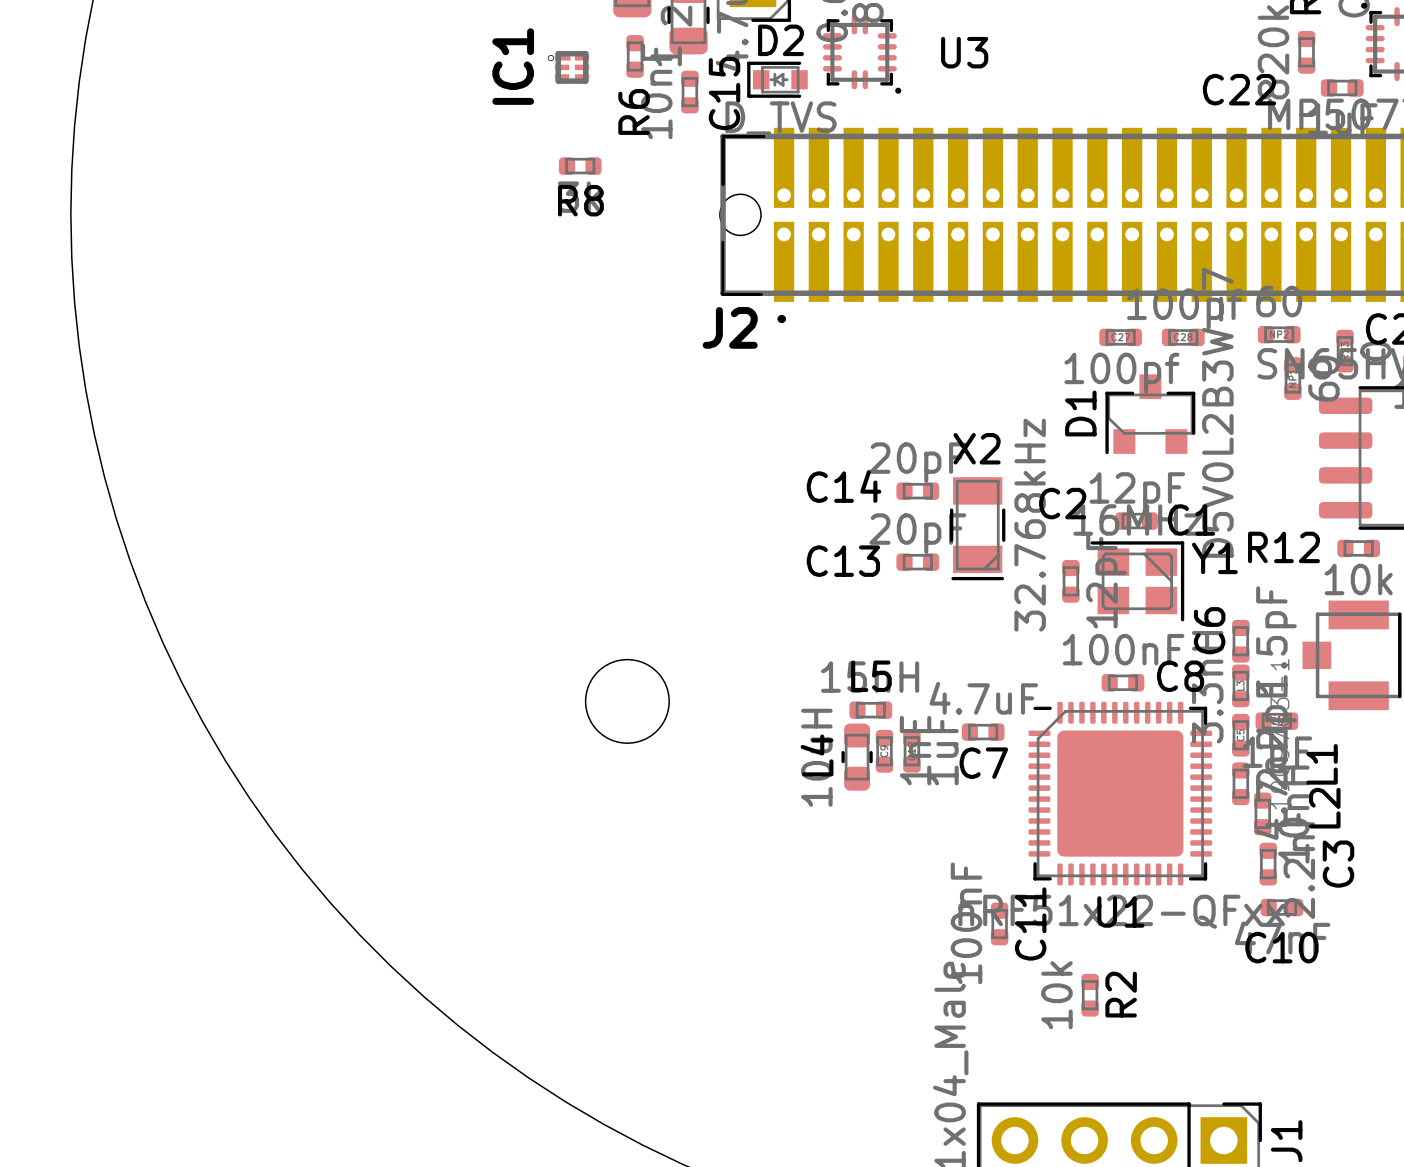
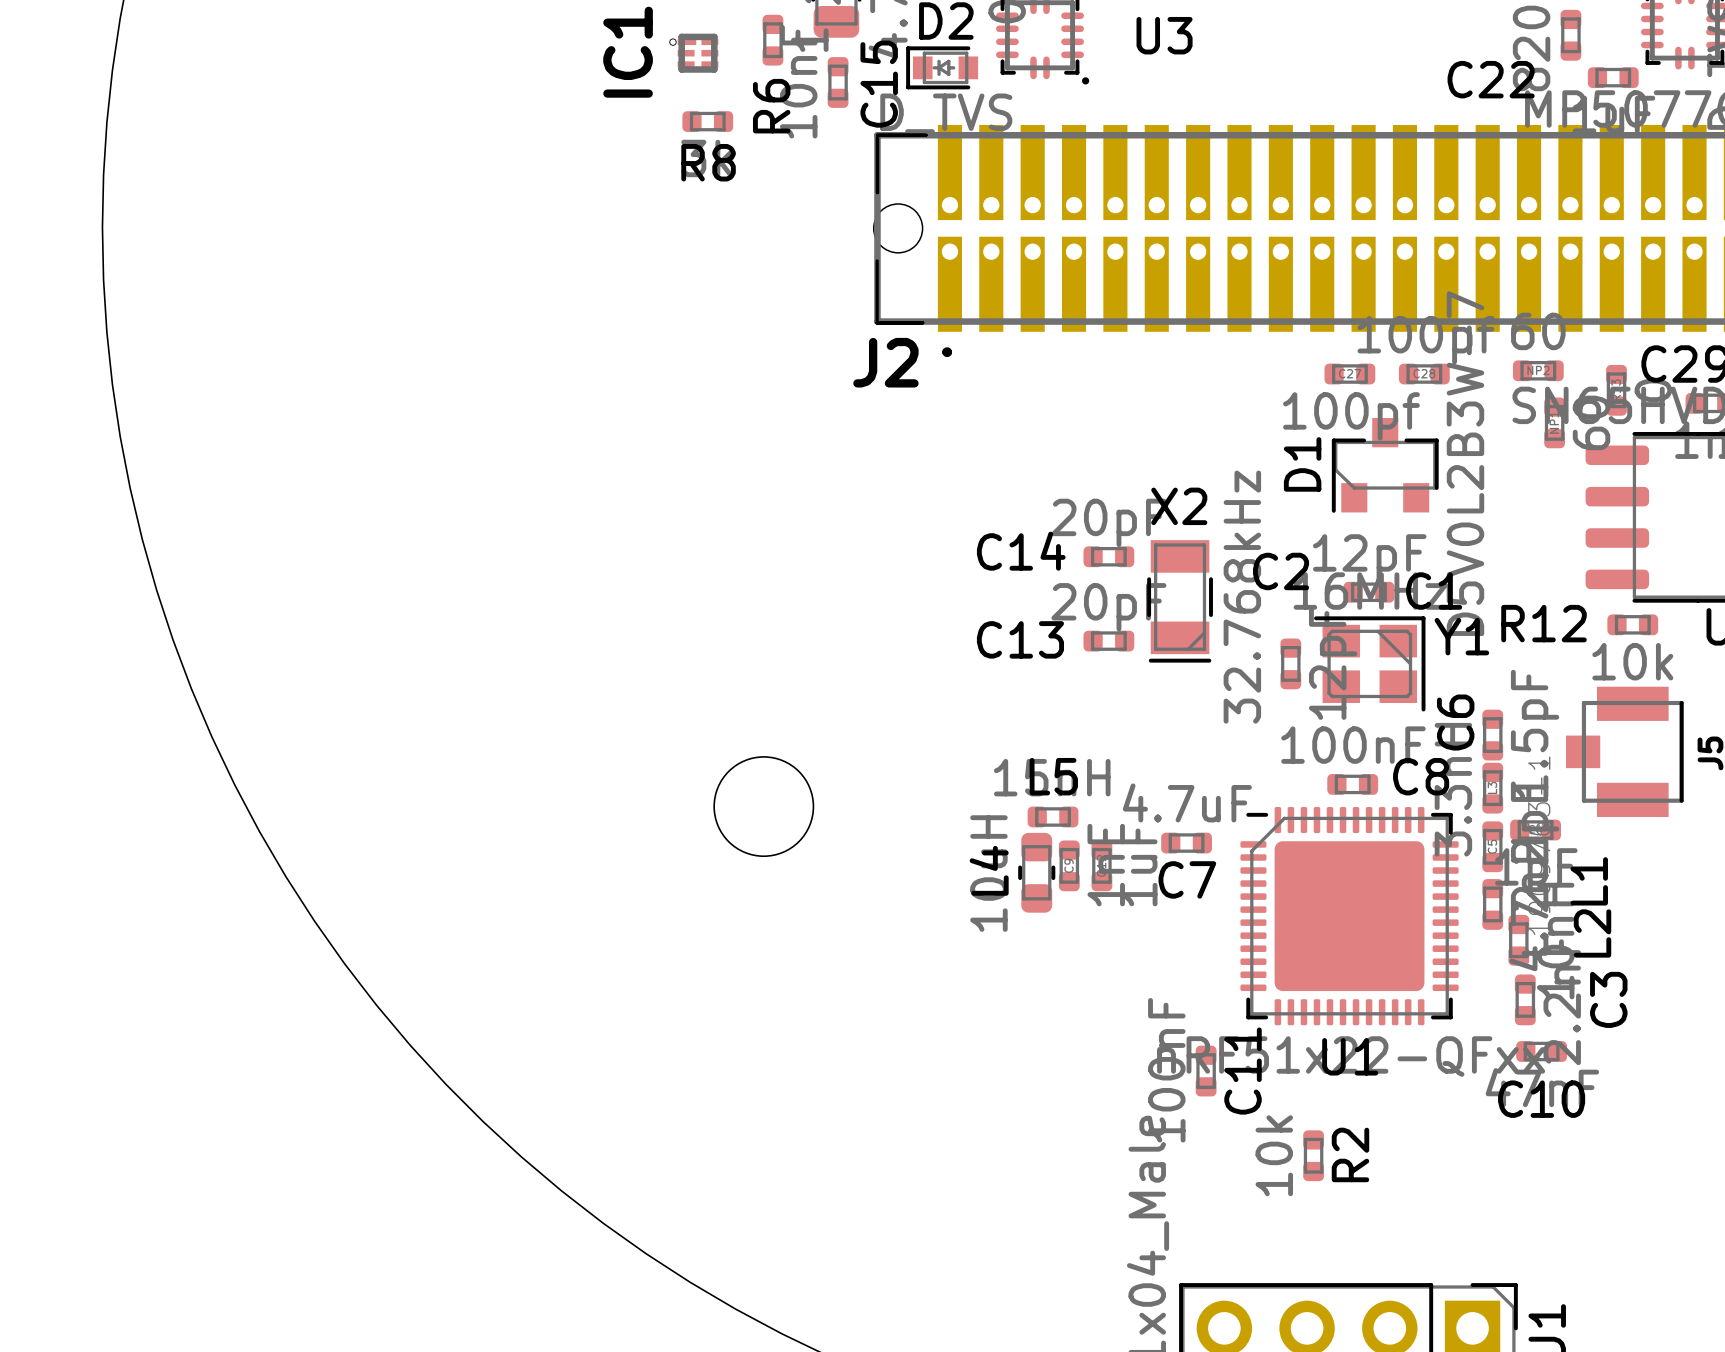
R8 position: (580, 166) -> (707, 121)

